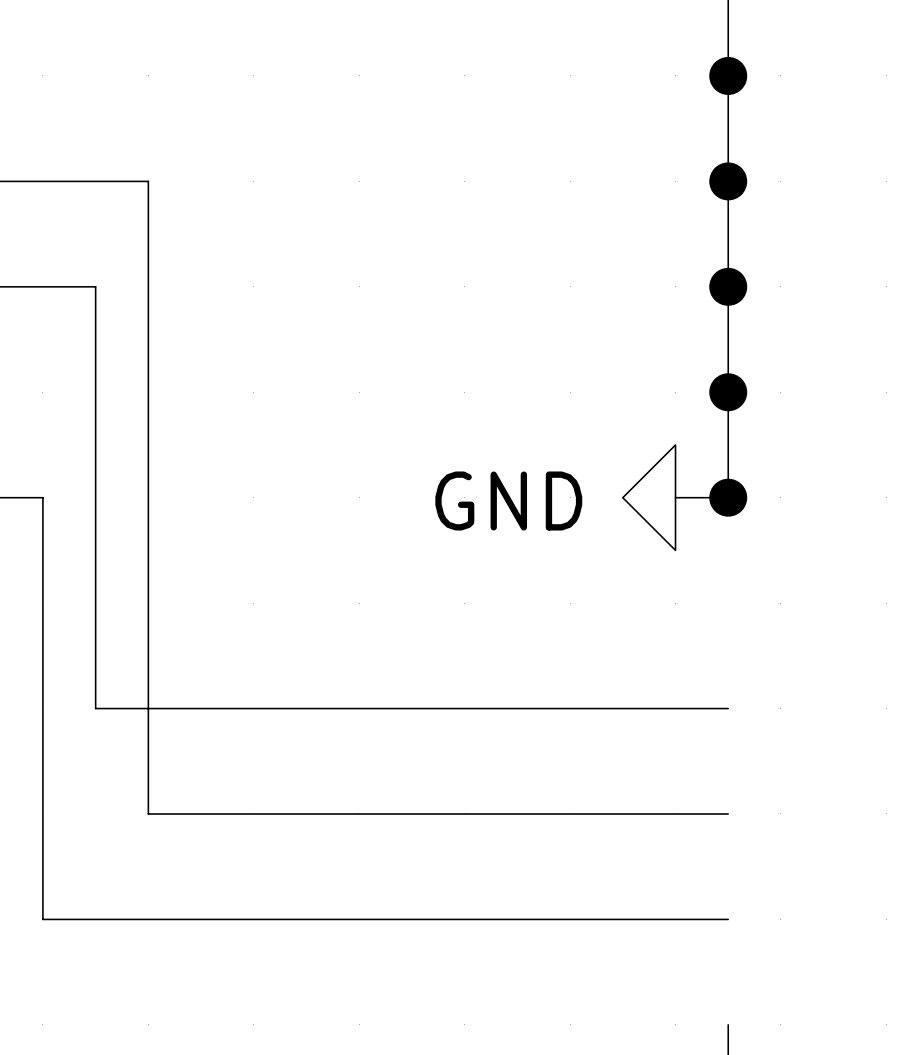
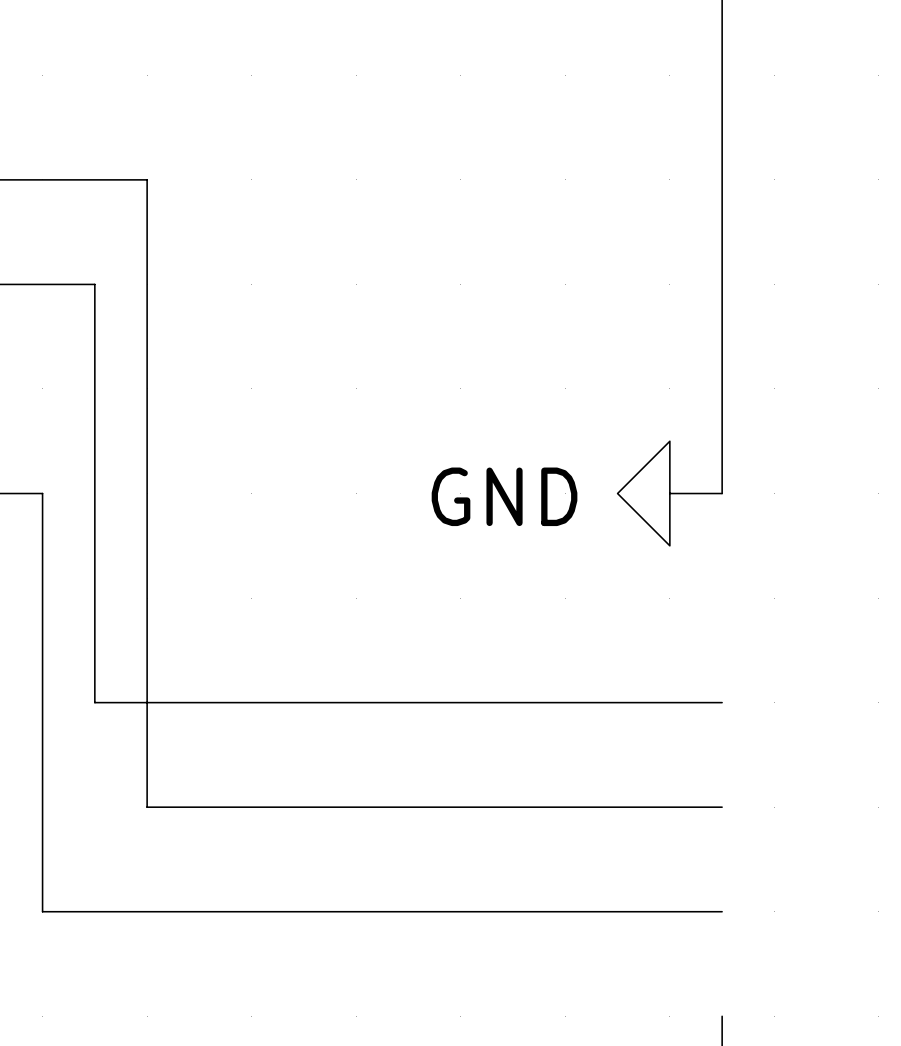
junction: (728, 75) -> none
junction: (728, 181) -> none
junction: (728, 286) -> none
junction: (728, 392) -> none
junction: (728, 497) -> none

